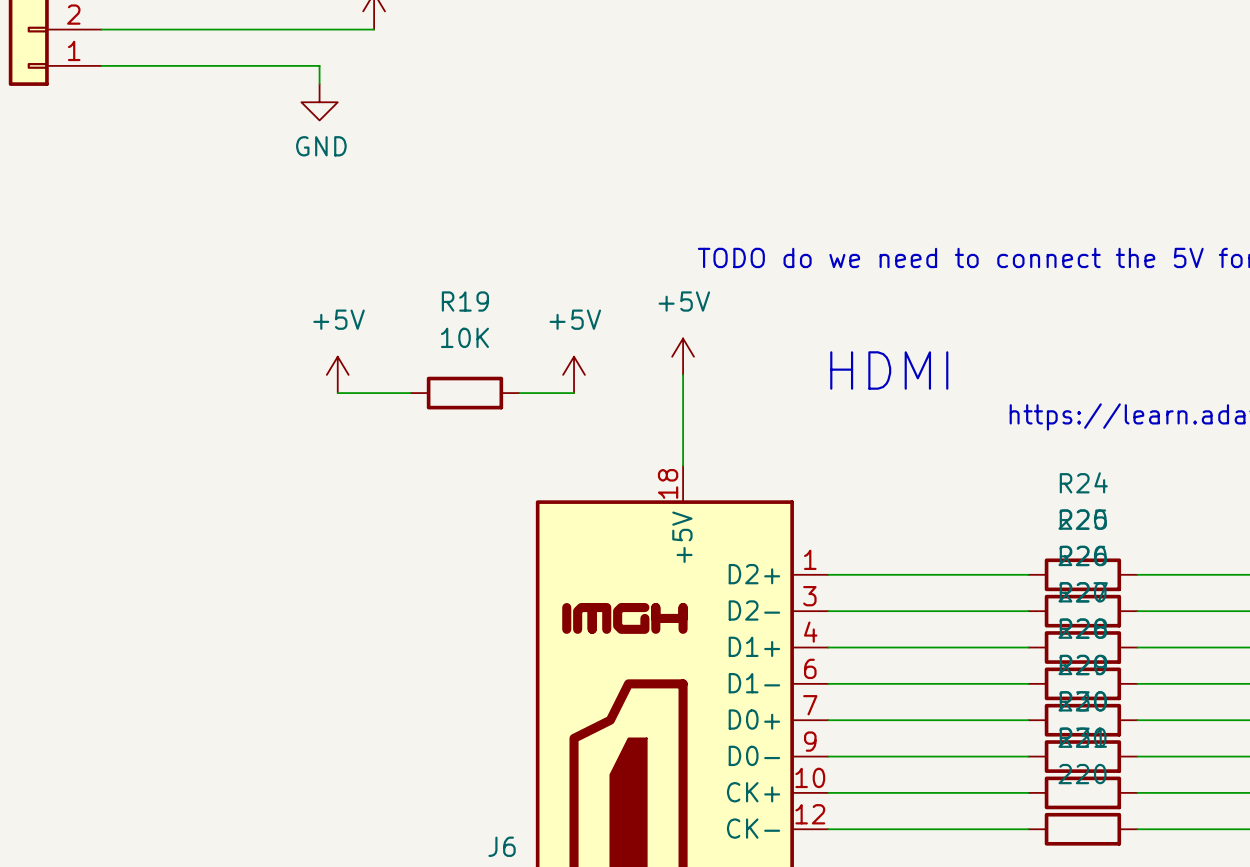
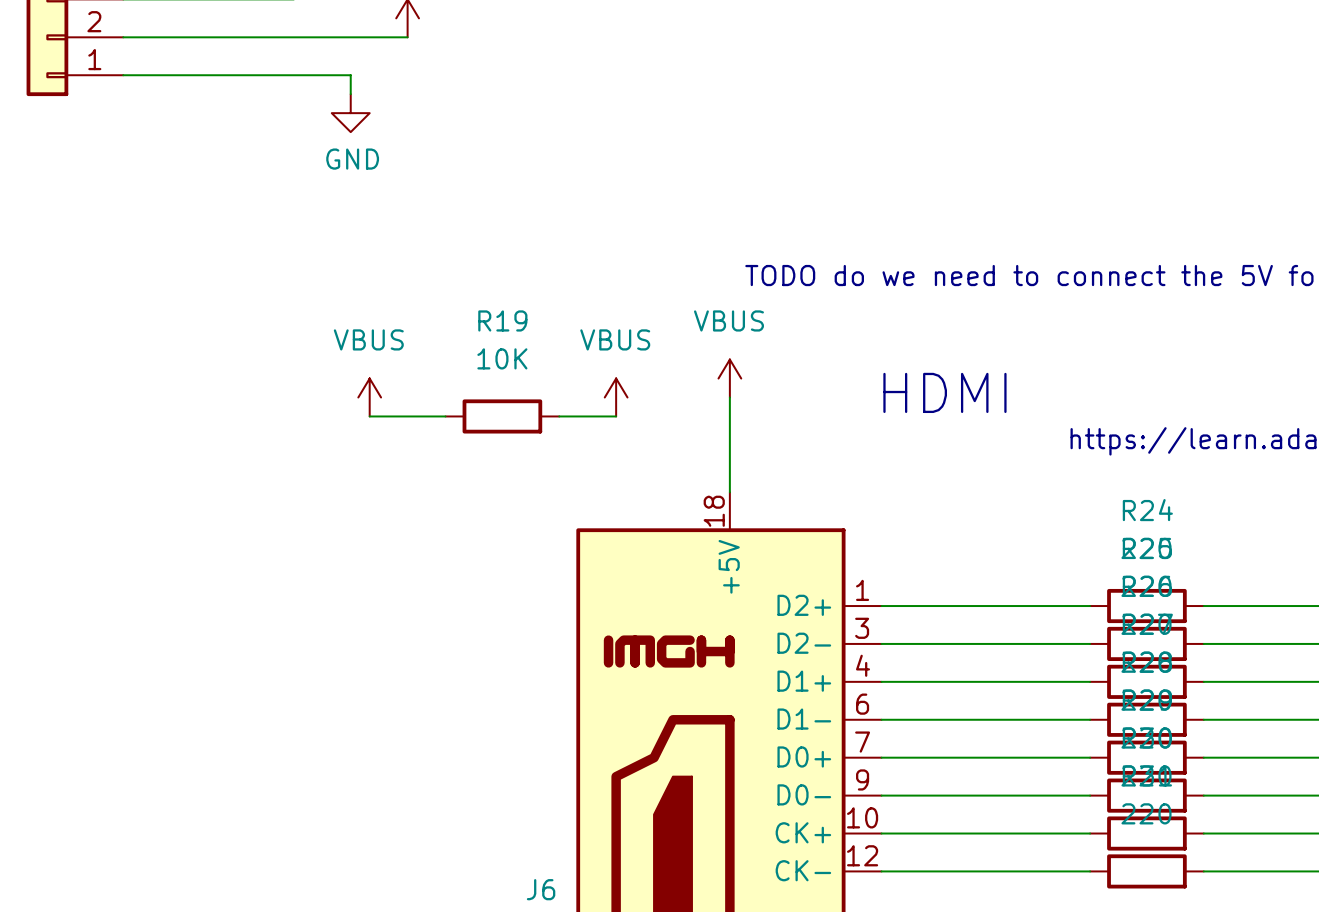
power symbol: +5V (683, 356) -> VBUS (729, 378)
power symbol: +5V (337, 374) -> VBUS (369, 397)
power symbol: +5V (574, 374) -> VBUS (616, 397)

